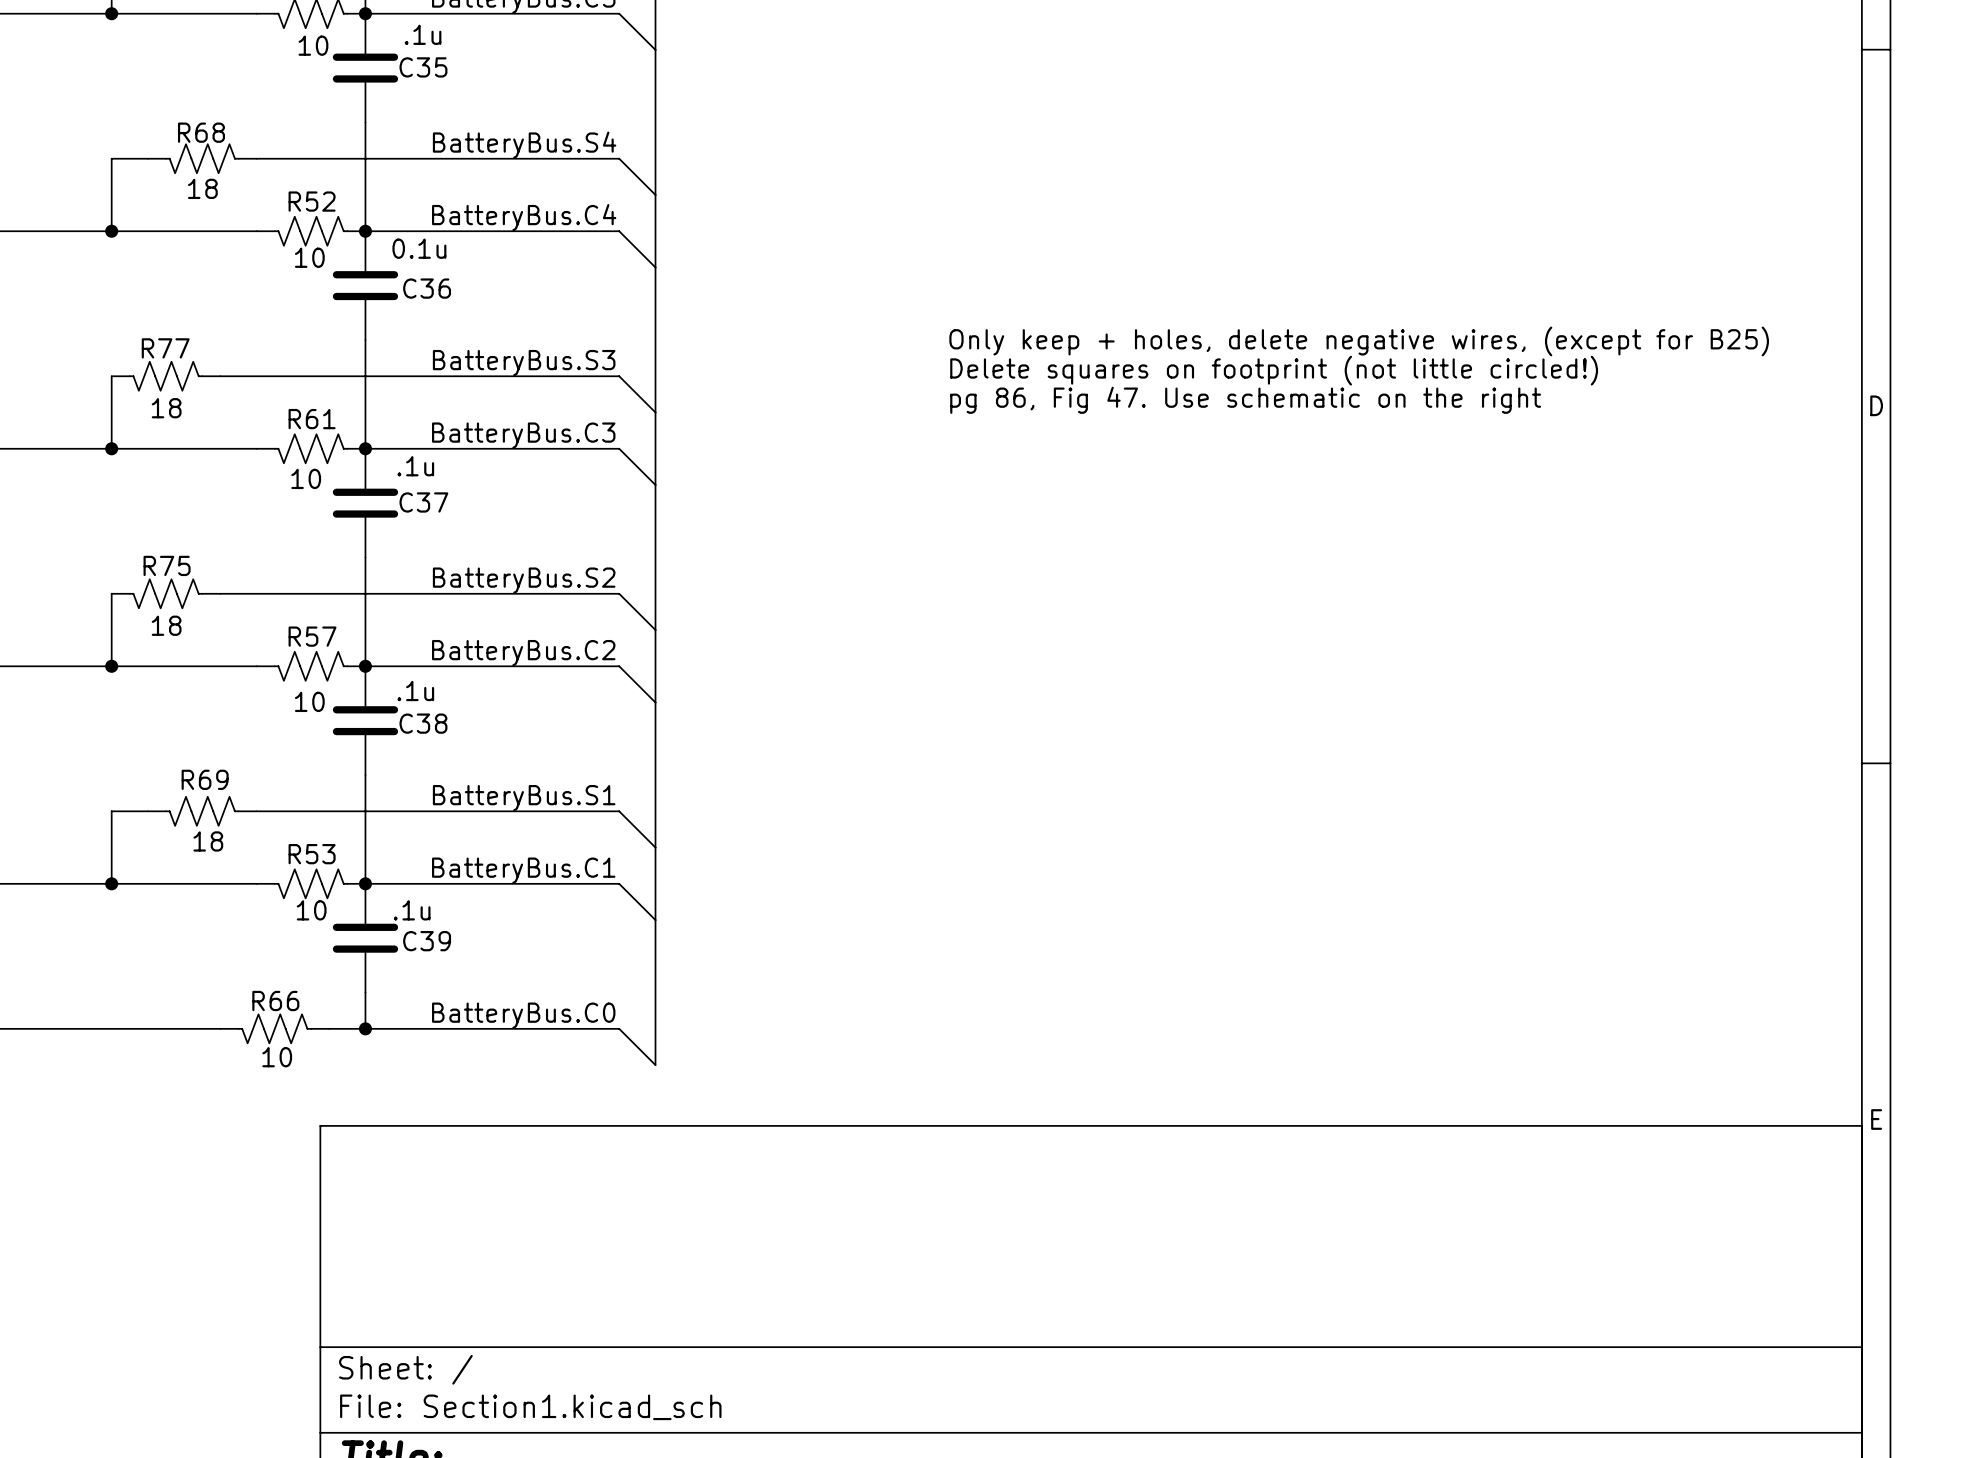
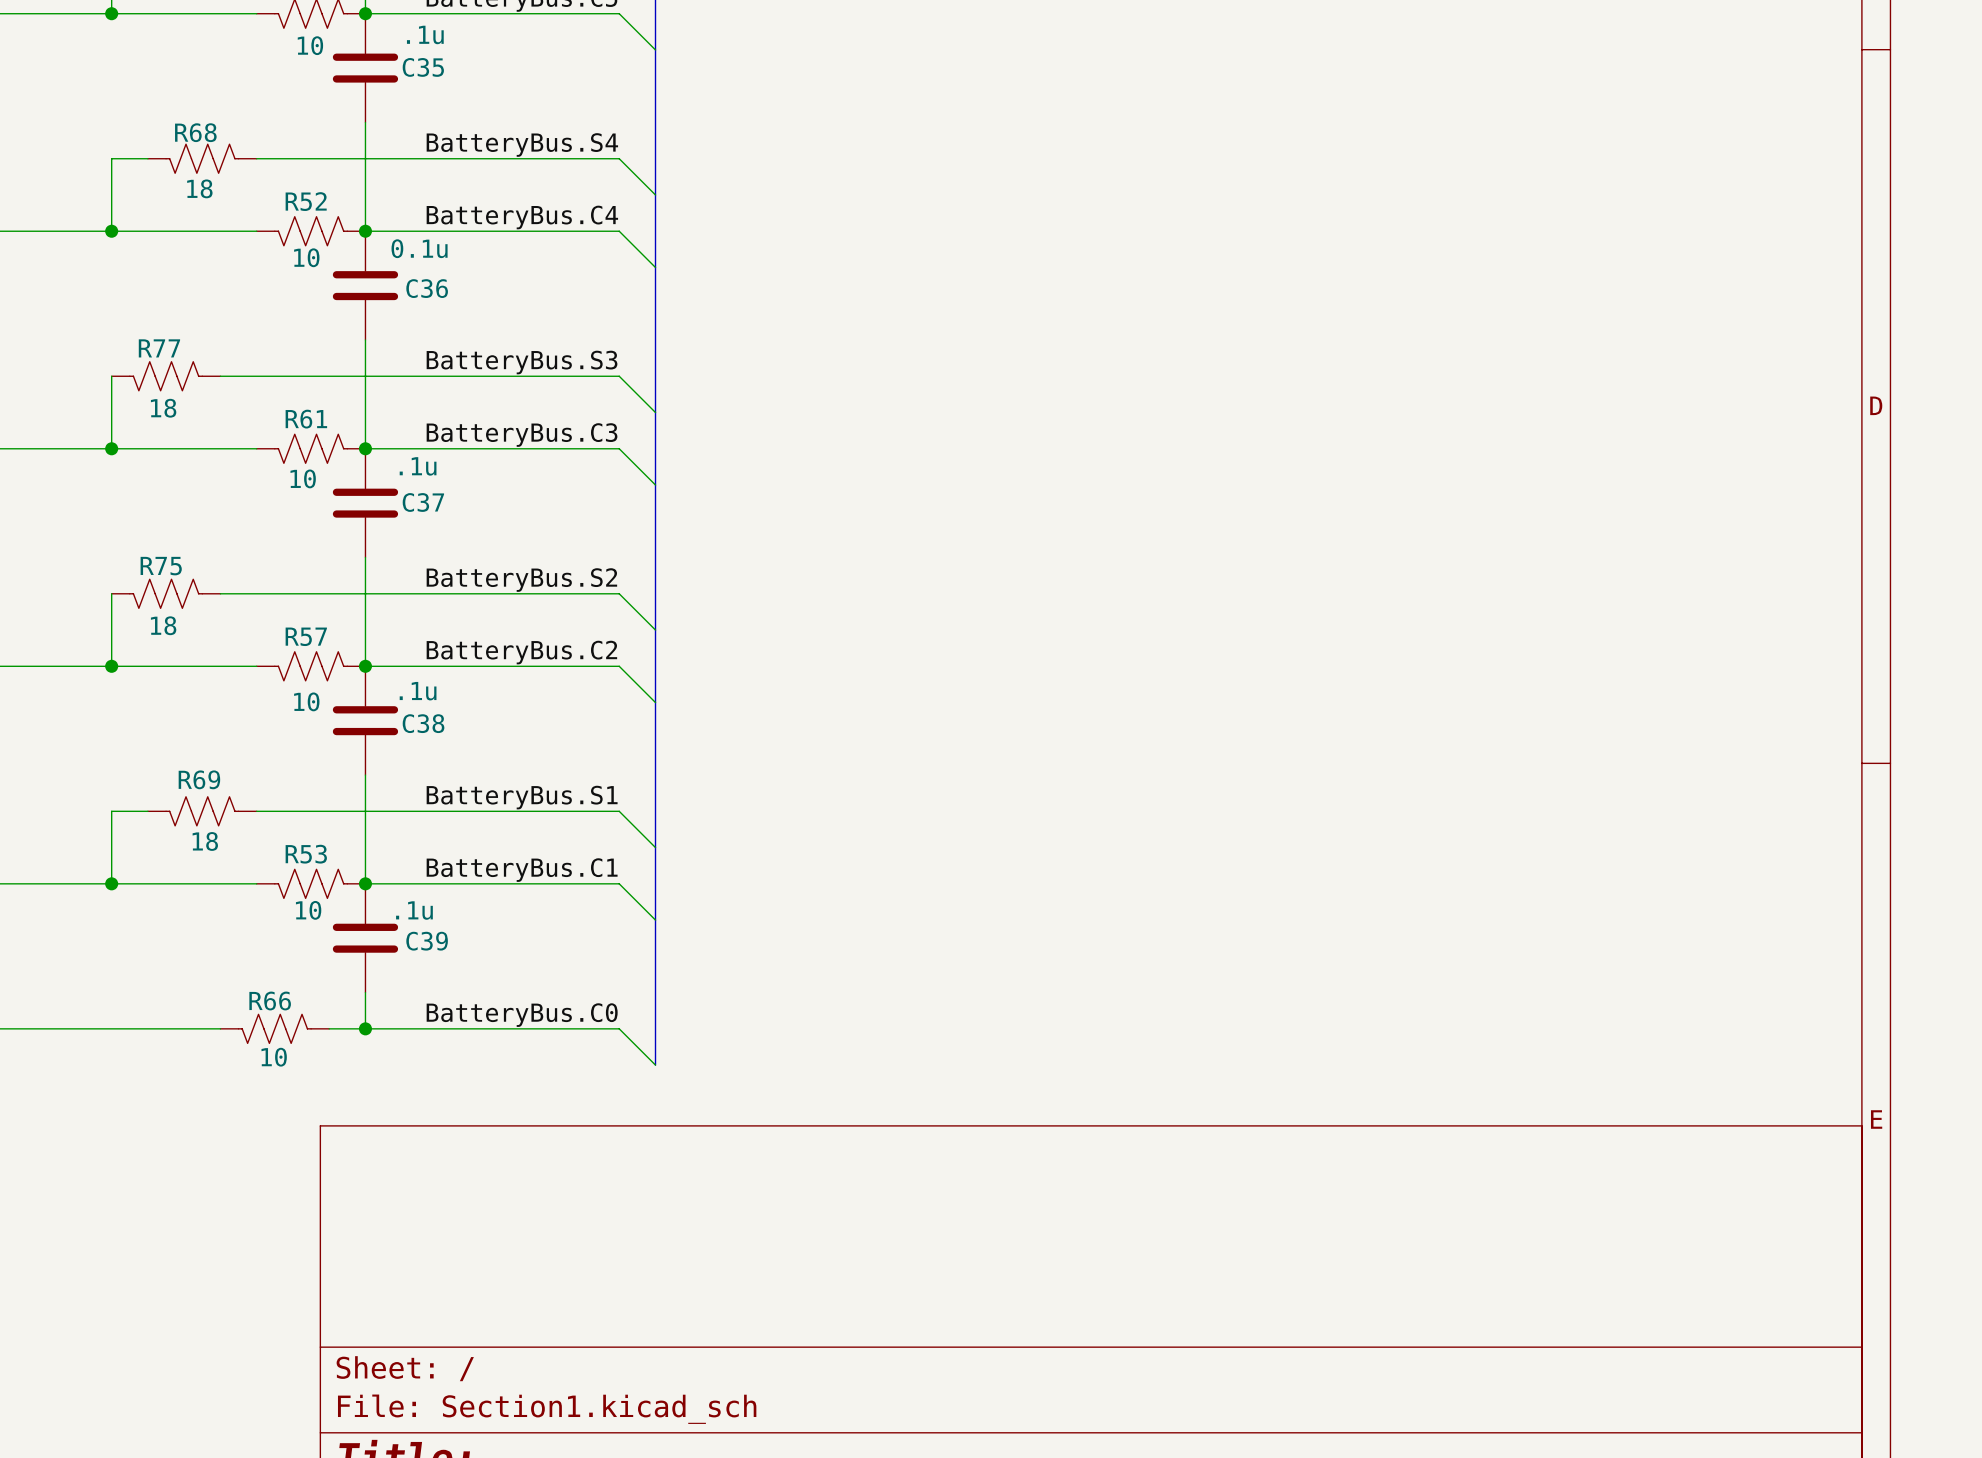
text: Only keep + holes, delete negative wires, (except for B25) (1359, 341) -> none
text: Delete squares on footprint (not little circled!) (1274, 370) -> none
text: pg 86, Fig 47. Use schematic on the right (1245, 400) -> none

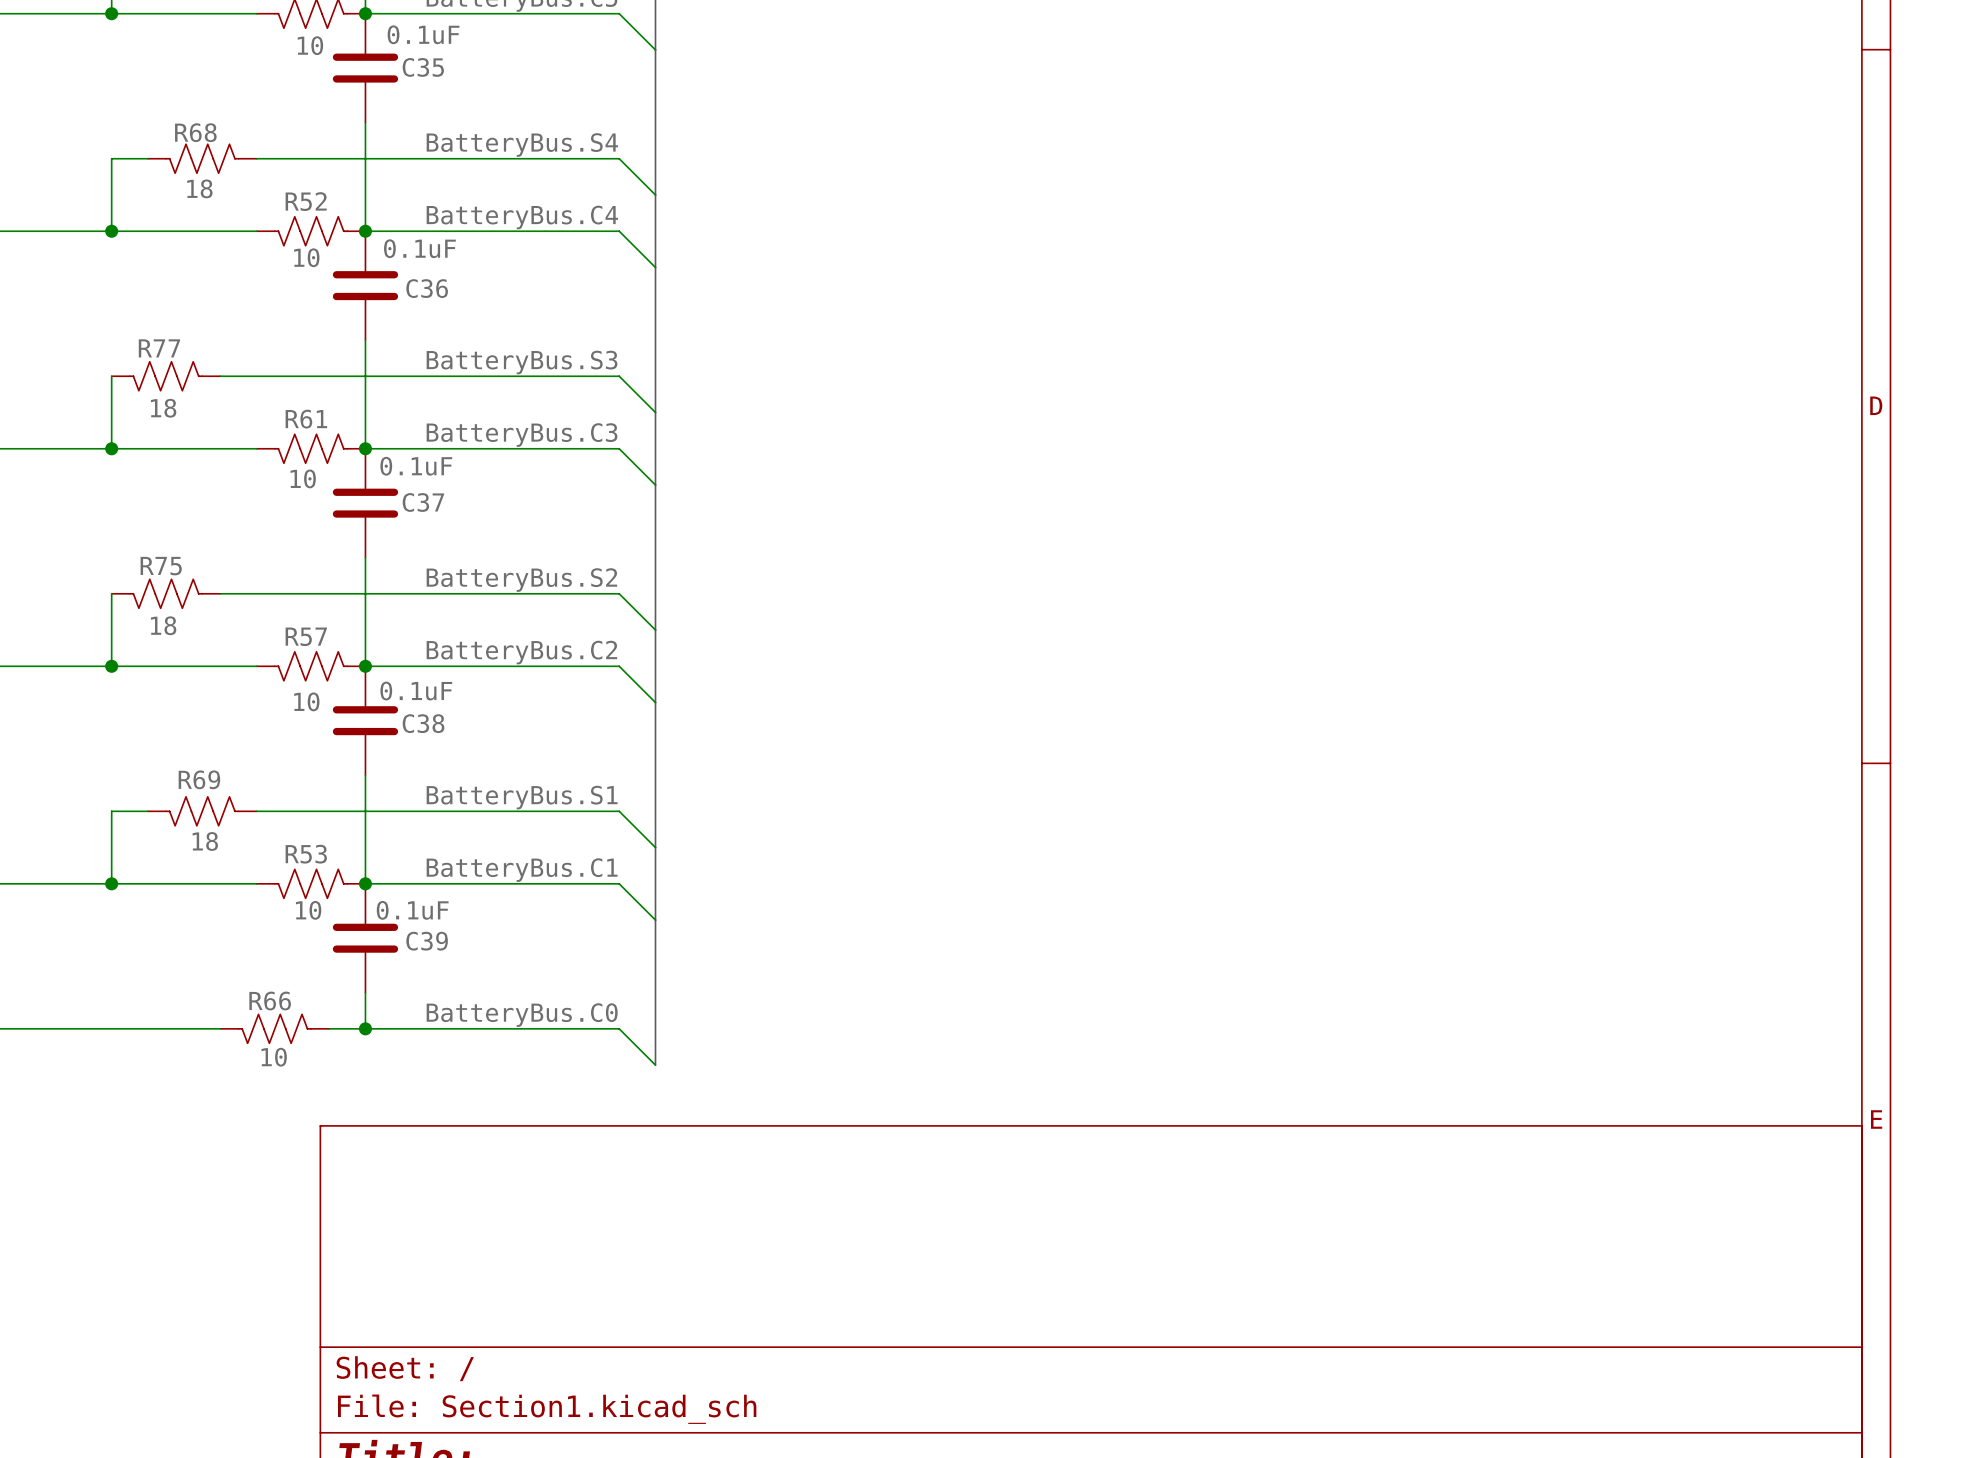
C35 value: .1u (425, 34) -> 0.1uF (423, 34)
C36 value: 0.1u (419, 248) -> 0.1uF (419, 248)
C37 value: .1u (418, 466) -> 0.1uF (416, 466)
C38 value: .1u (418, 691) -> 0.1uF (416, 691)
C39 value: .1u (414, 910) -> 0.1uF (412, 910)

